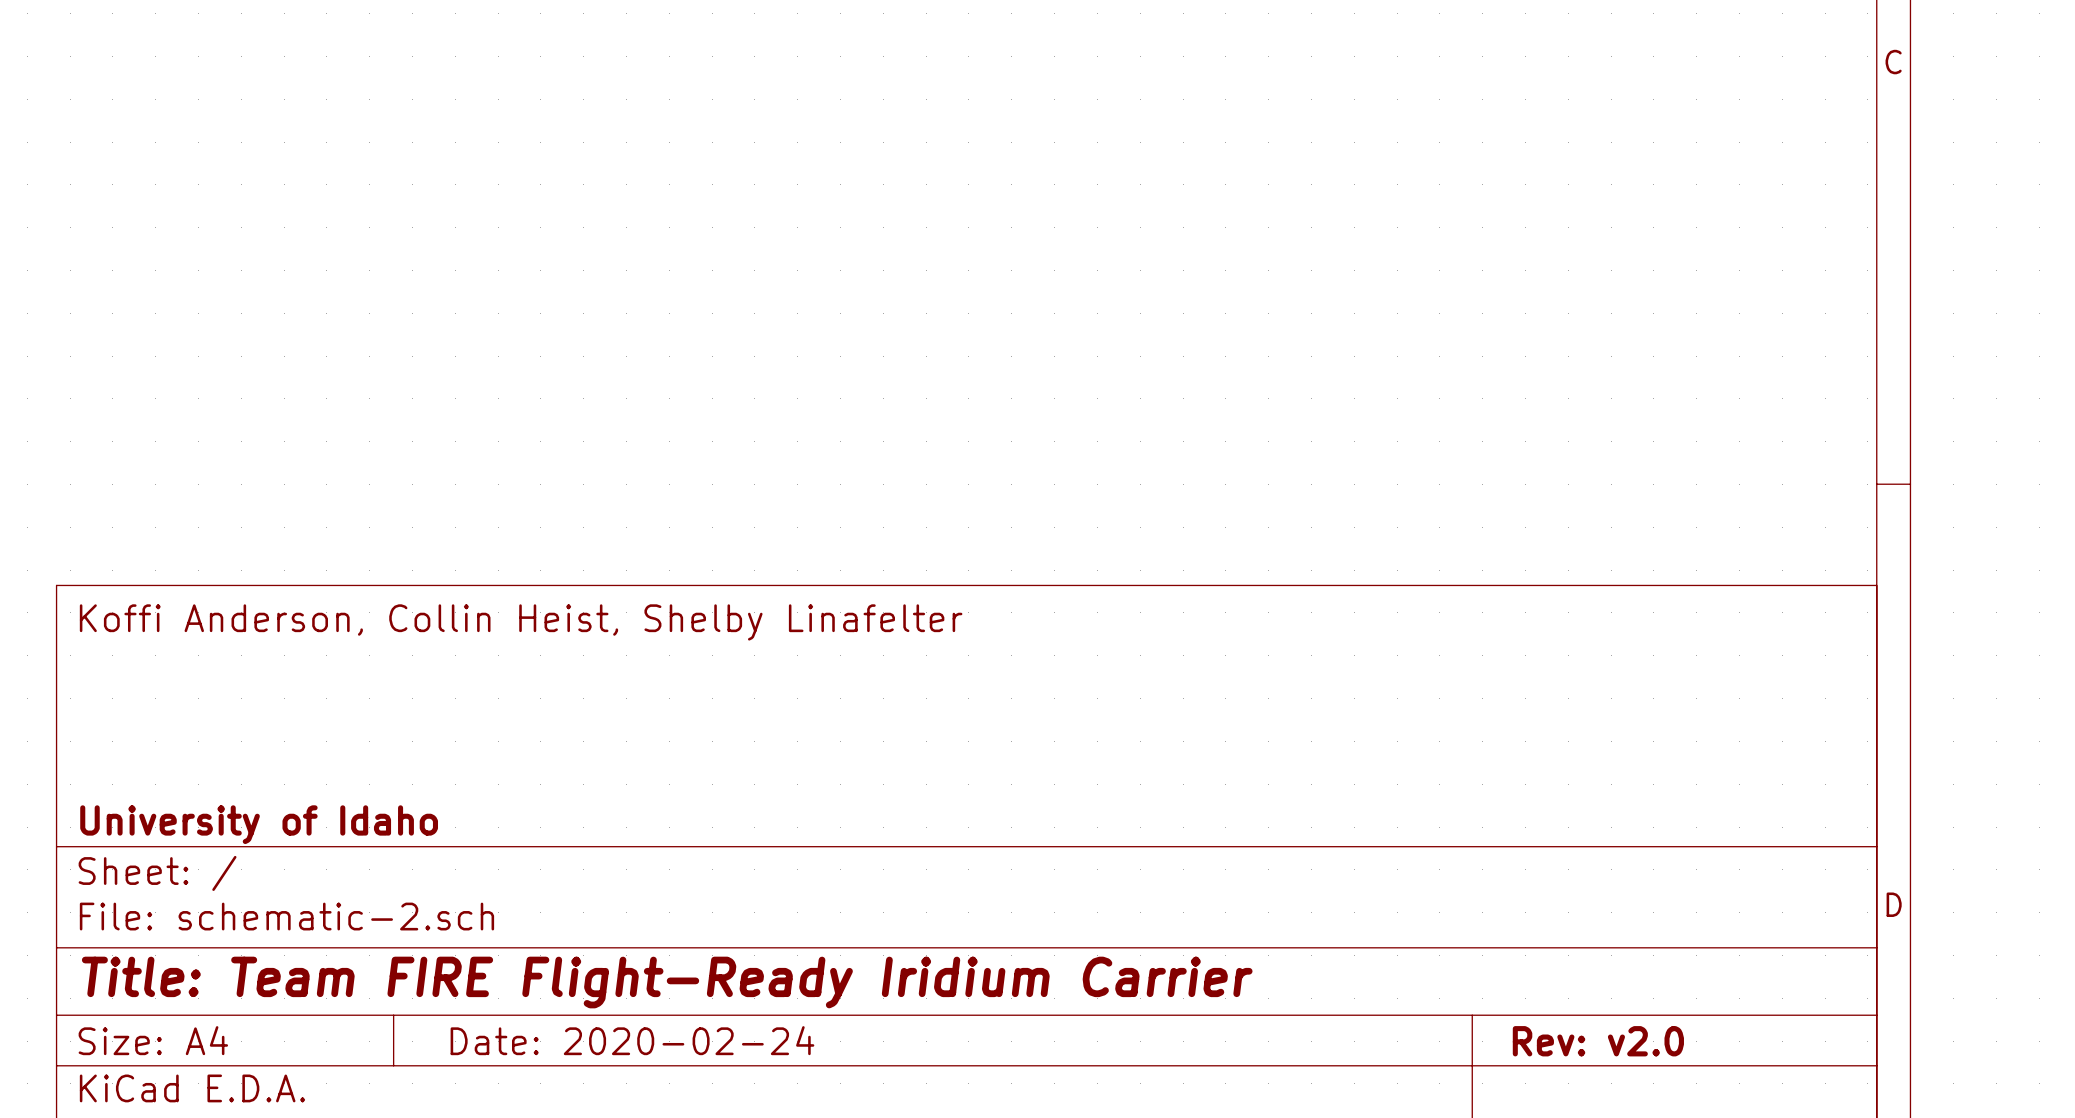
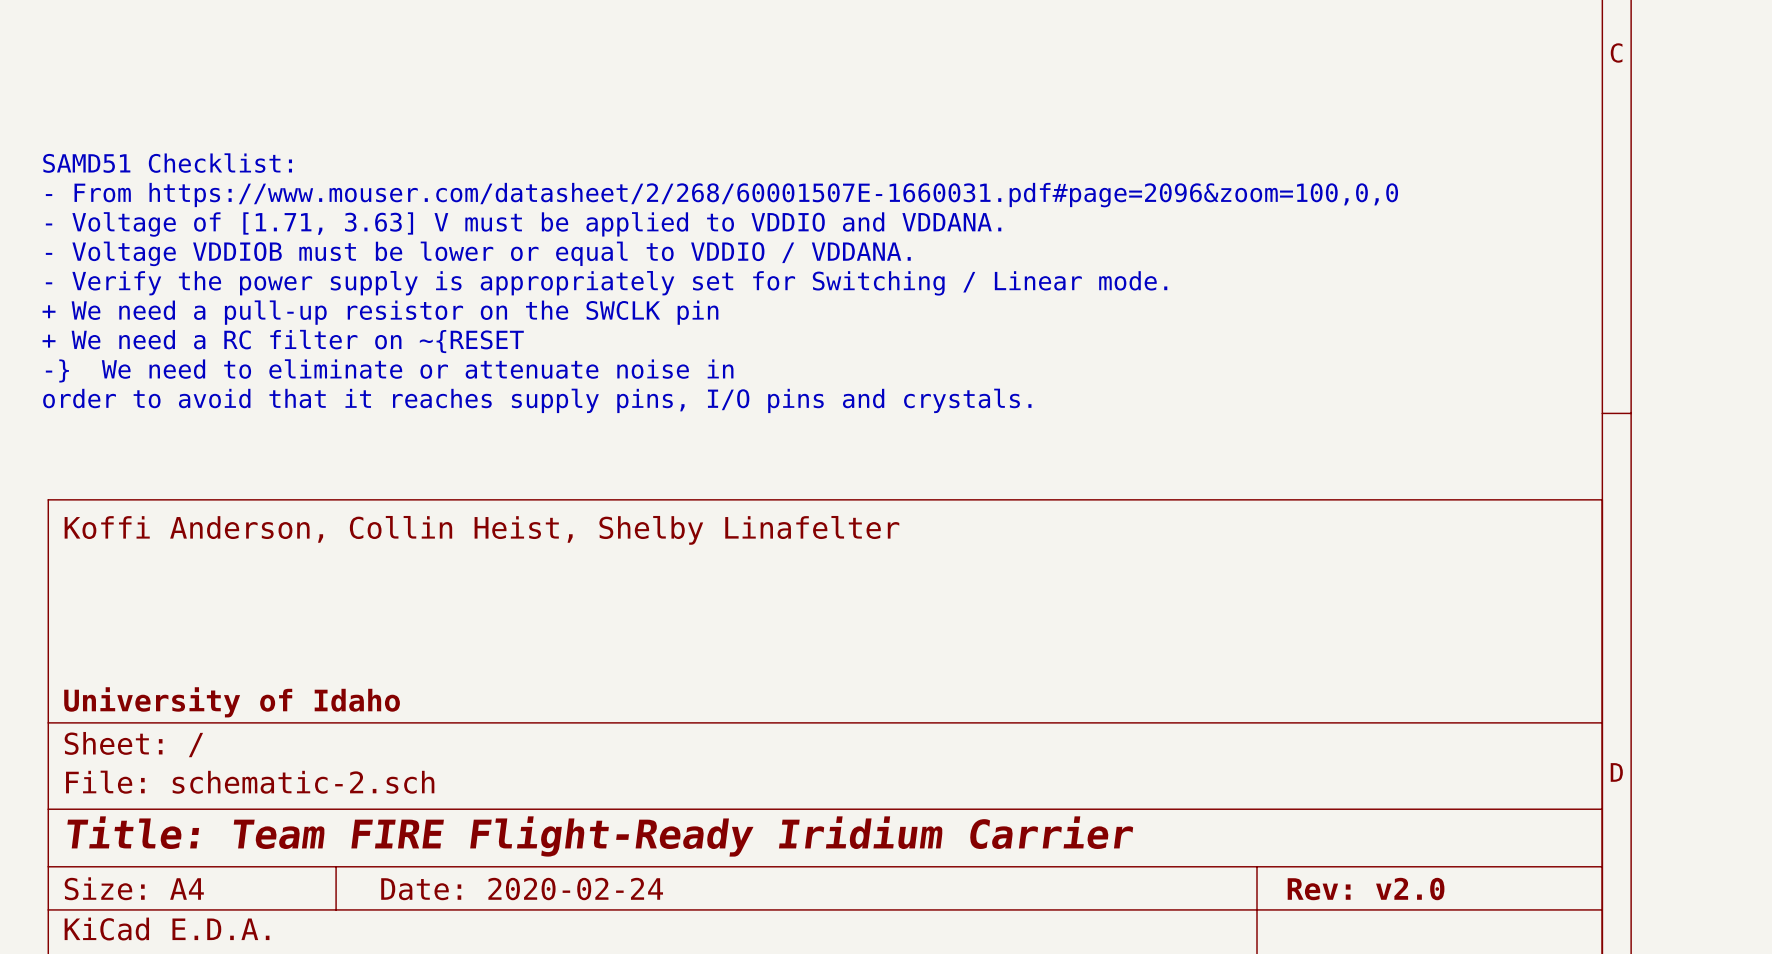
text: none -> SAMD51 Checklist: (167, 163)
text: none -> - From https://www.mouser.com/datasheet/2/268/60001507E-1660031.pdf#page=2096&zoom=100,0,0 (721, 195)
text: none -> - Voltage of [1.71, 3.63] V must be applied to VDDIO and VDDANA. (523, 224)
text: none -> - Voltage VDDIOB must be lower or equal to VDDIO / VDDANA. (478, 253)
text: none -> - Verify the power supply is appropriately set for Switching / Linear mode. (606, 283)
text: none -> + We need a pull-up resistor on the SWCLK pin (380, 312)
text: none -> + We need a RC filter on ~{RESET (283, 341)
text: none -> -} We need to eliminate or attenuate noise in (389, 370)
text: none -> order to avoid that it reaches supply pins, I/O pins and crystals. (537, 400)

